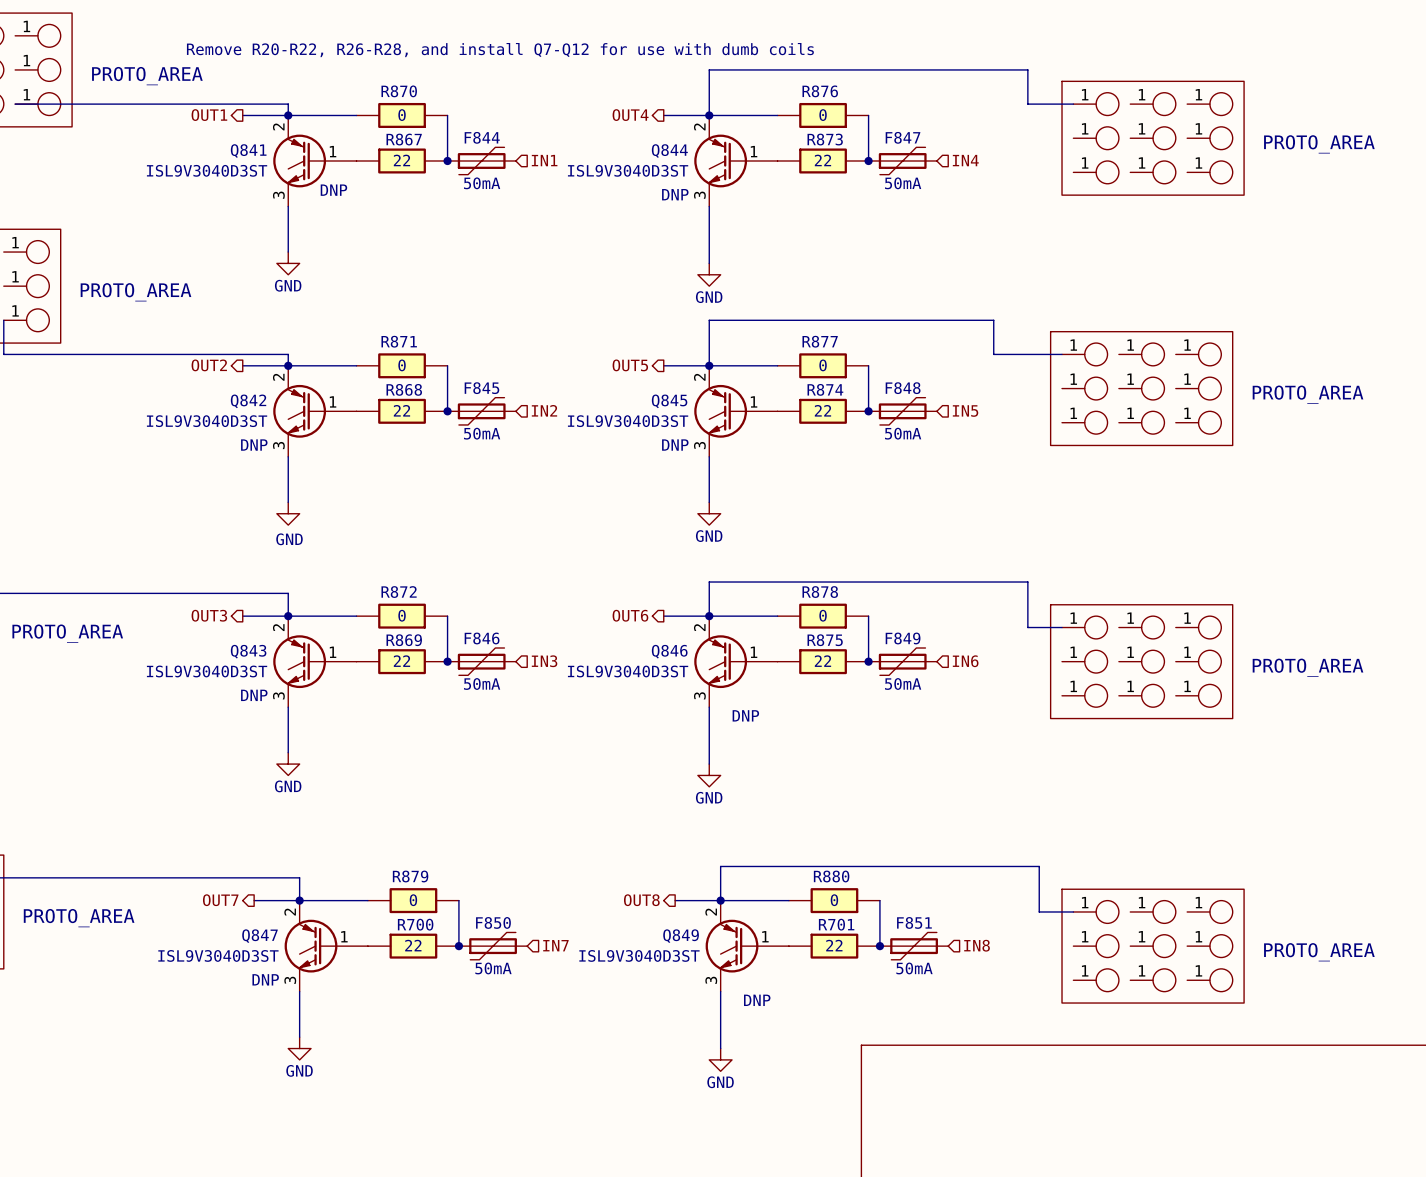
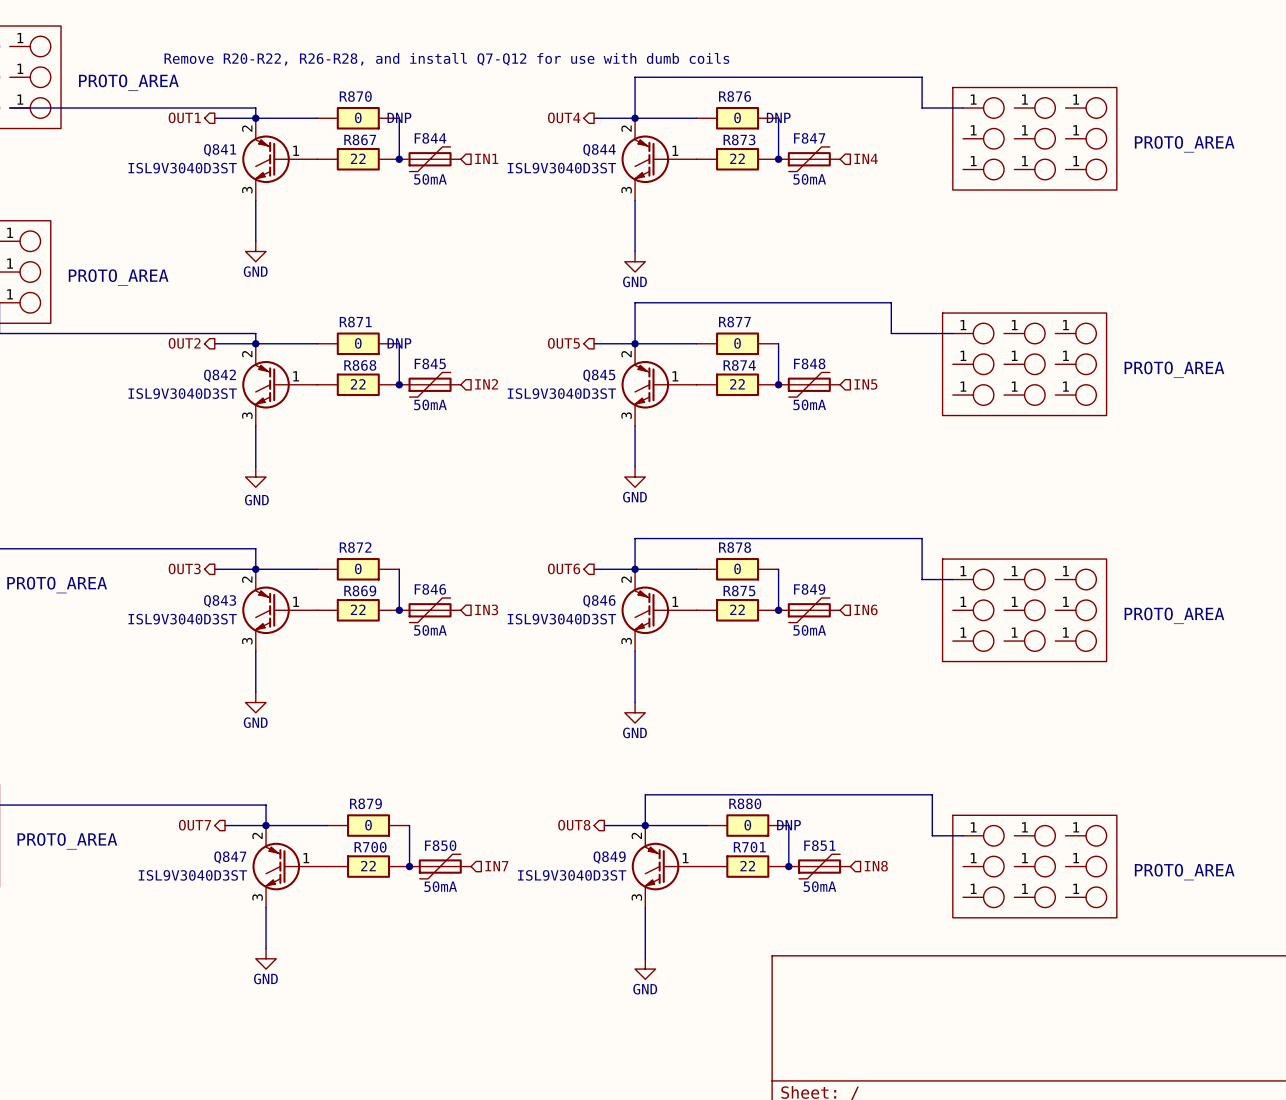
R870 text: none -> DNP (399, 117)
R876 text: none -> DNP (778, 117)
Q841 text: DNP (333, 190) -> none
Q844 text: DNP (675, 194) -> none
R871 text: none -> DNP (399, 343)
Q842 text: DNP (254, 445) -> none
Q845 text: DNP (675, 445) -> none
Q843 text: DNP (254, 695) -> none
Q846 text: DNP (745, 715) -> none
R880 text: none -> DNP (788, 825)
Q847 text: DNP (265, 979) -> none
Q849 text: DNP (757, 1000) -> none

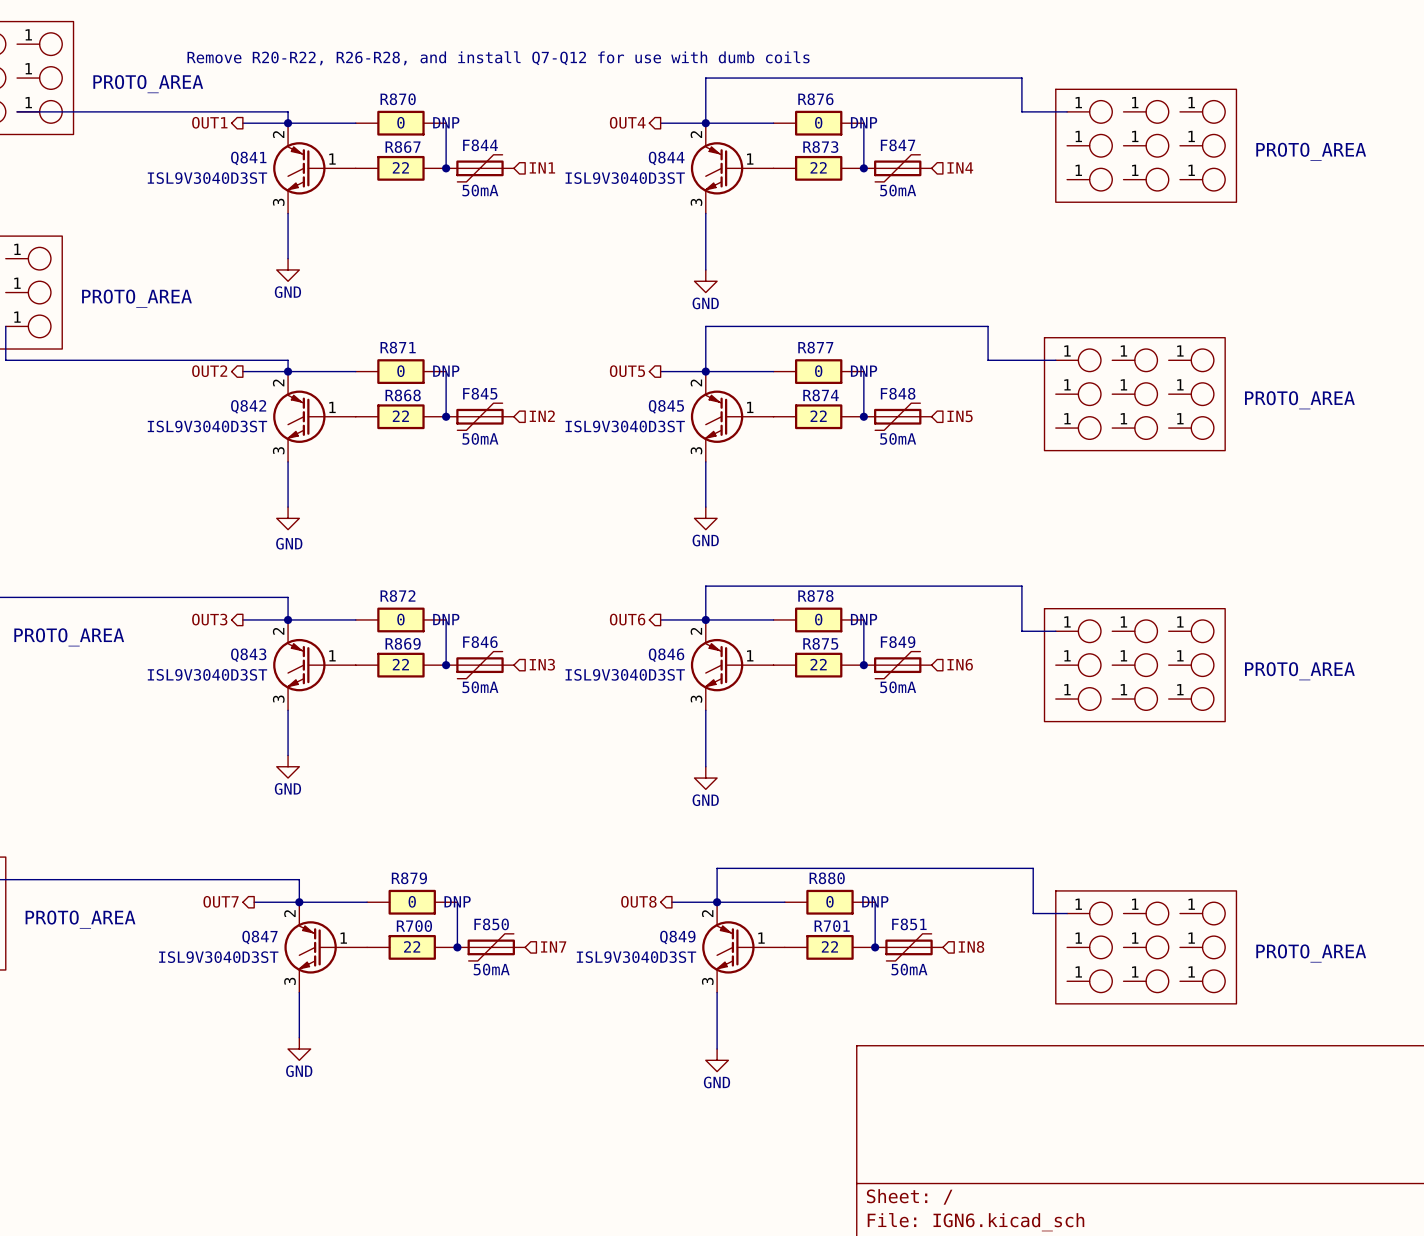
R877 text: none -> DNP (864, 371)
R872 text: none -> DNP (446, 619)
R878 text: none -> DNP (864, 619)
R879 text: none -> DNP (457, 901)

